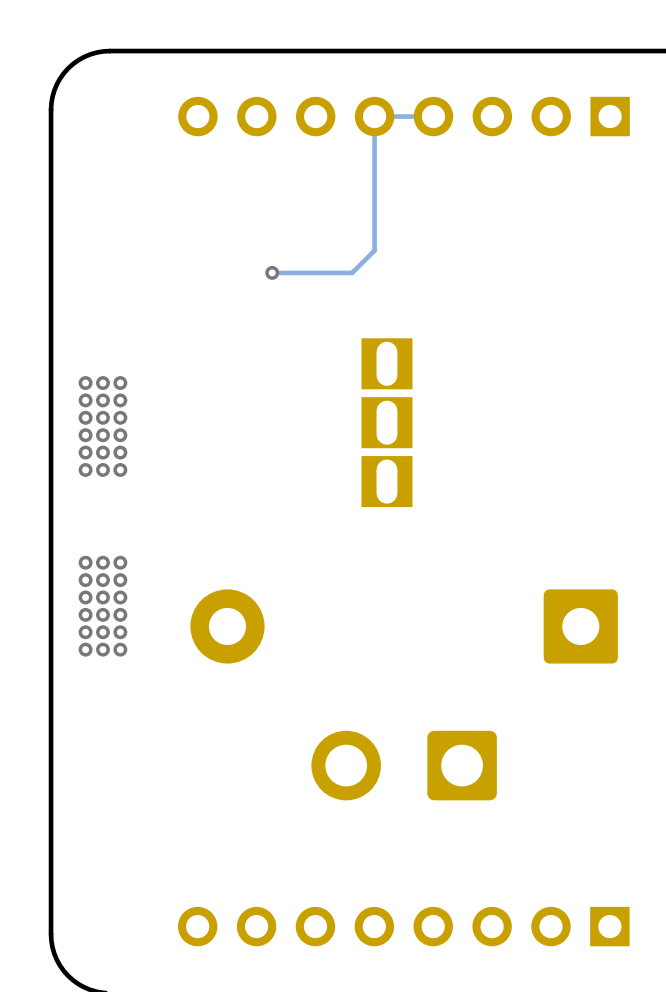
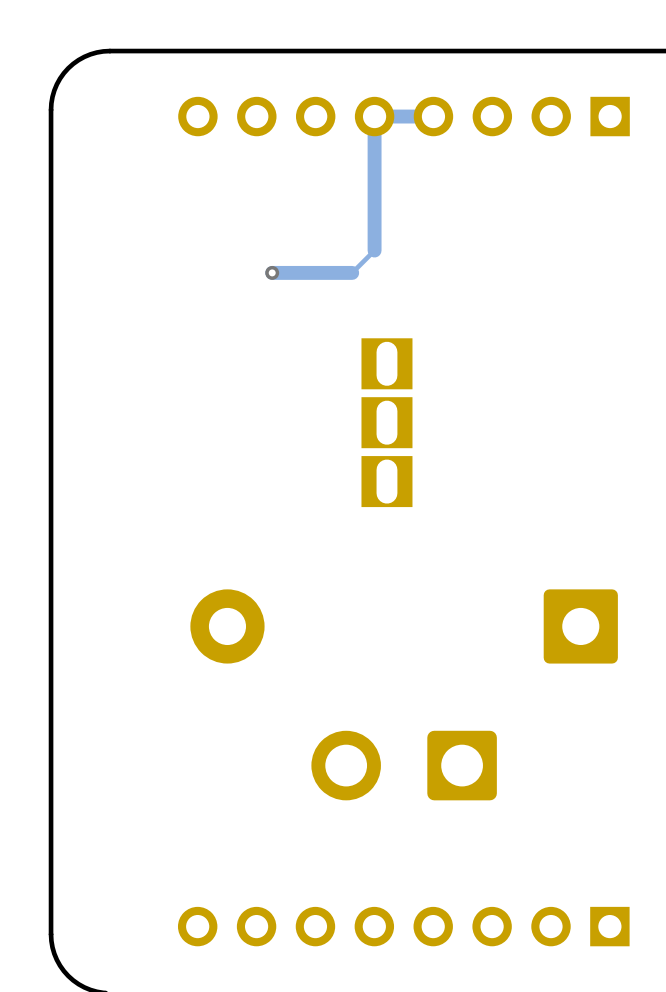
track width: thin (433, 116) (374, 116) (374, 250) -> thick (433, 116) (374, 116) (374, 250)
track width: thin (352, 272) (272, 272) -> thick (352, 272) (272, 272)
via: (85, 383) -> none
via: (102, 383) -> none
via: (120, 383) -> none
via: (85, 400) -> none
via: (102, 400) -> none
via: (120, 400) -> none
via: (85, 417) -> none
via: (102, 417) -> none
via: (120, 417) -> none
via: (85, 435) -> none
via: (102, 435) -> none
via: (120, 435) -> none
via: (85, 452) -> none
via: (102, 452) -> none
via: (120, 452) -> none
via: (85, 469) -> none
via: (102, 469) -> none
via: (120, 469) -> none
via: (85, 562) -> none
via: (102, 562) -> none
via: (120, 562) -> none
via: (85, 580) -> none
via: (102, 580) -> none
via: (120, 580) -> none
via: (85, 597) -> none
via: (102, 597) -> none
via: (120, 597) -> none
via: (85, 614) -> none
via: (102, 614) -> none
via: (120, 614) -> none
via: (85, 632) -> none
via: (102, 632) -> none
via: (120, 632) -> none
via: (85, 649) -> none
via: (102, 649) -> none
via: (120, 649) -> none

